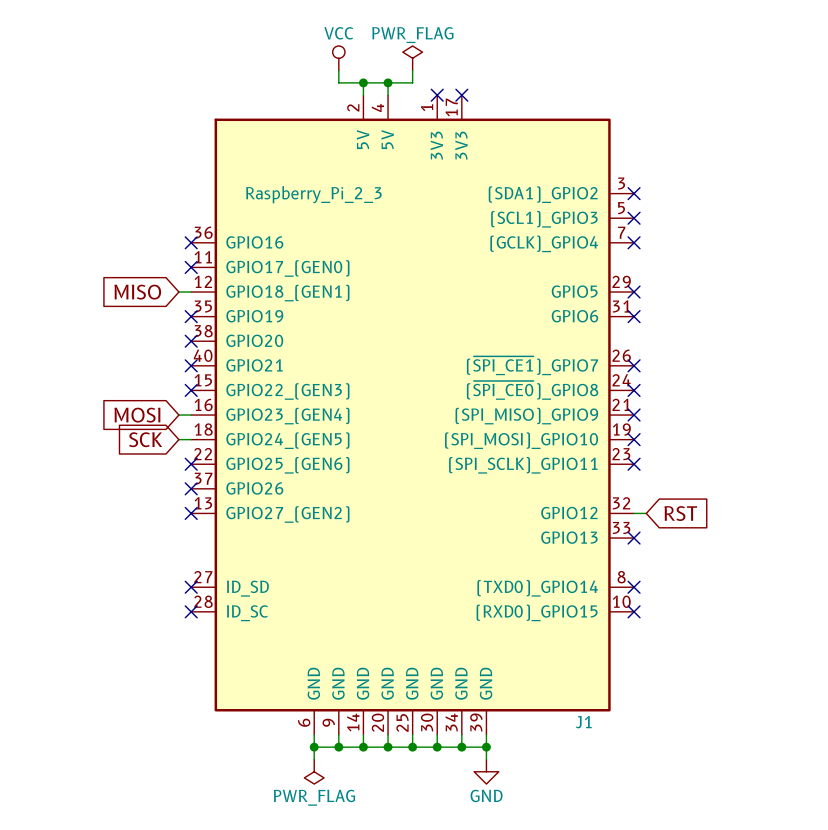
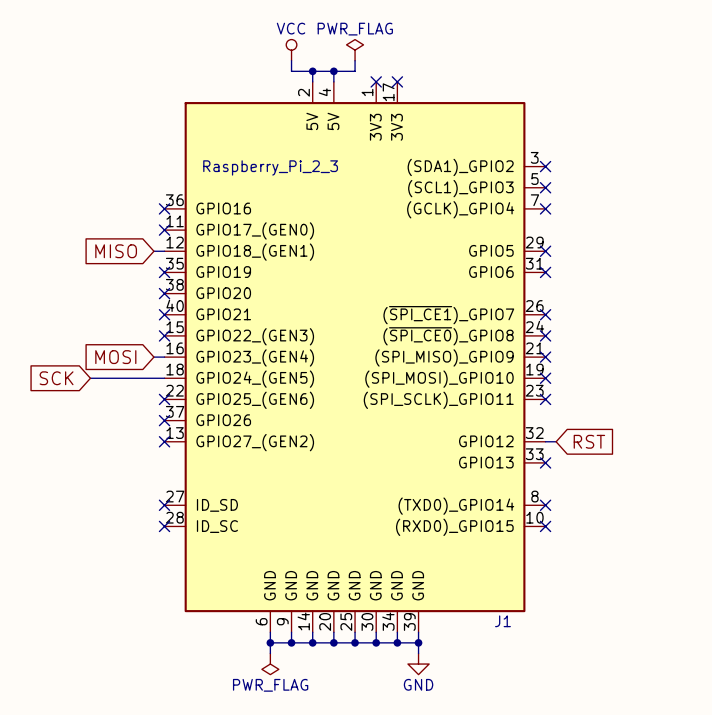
wire: none -> (90, 378) (153, 378)
global label position: SCK (145, 439) -> SCK (56, 378)

